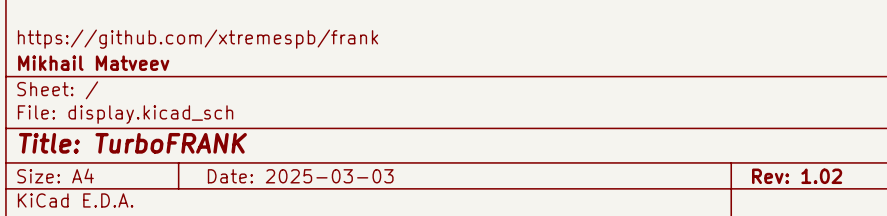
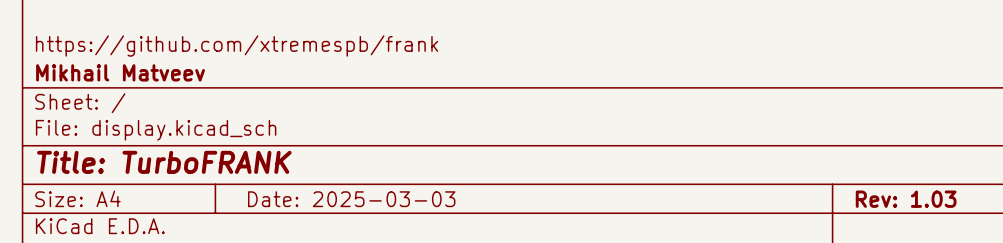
title block: Rev: 1.02 (797, 176) -> Rev: 1.03 (906, 199)

